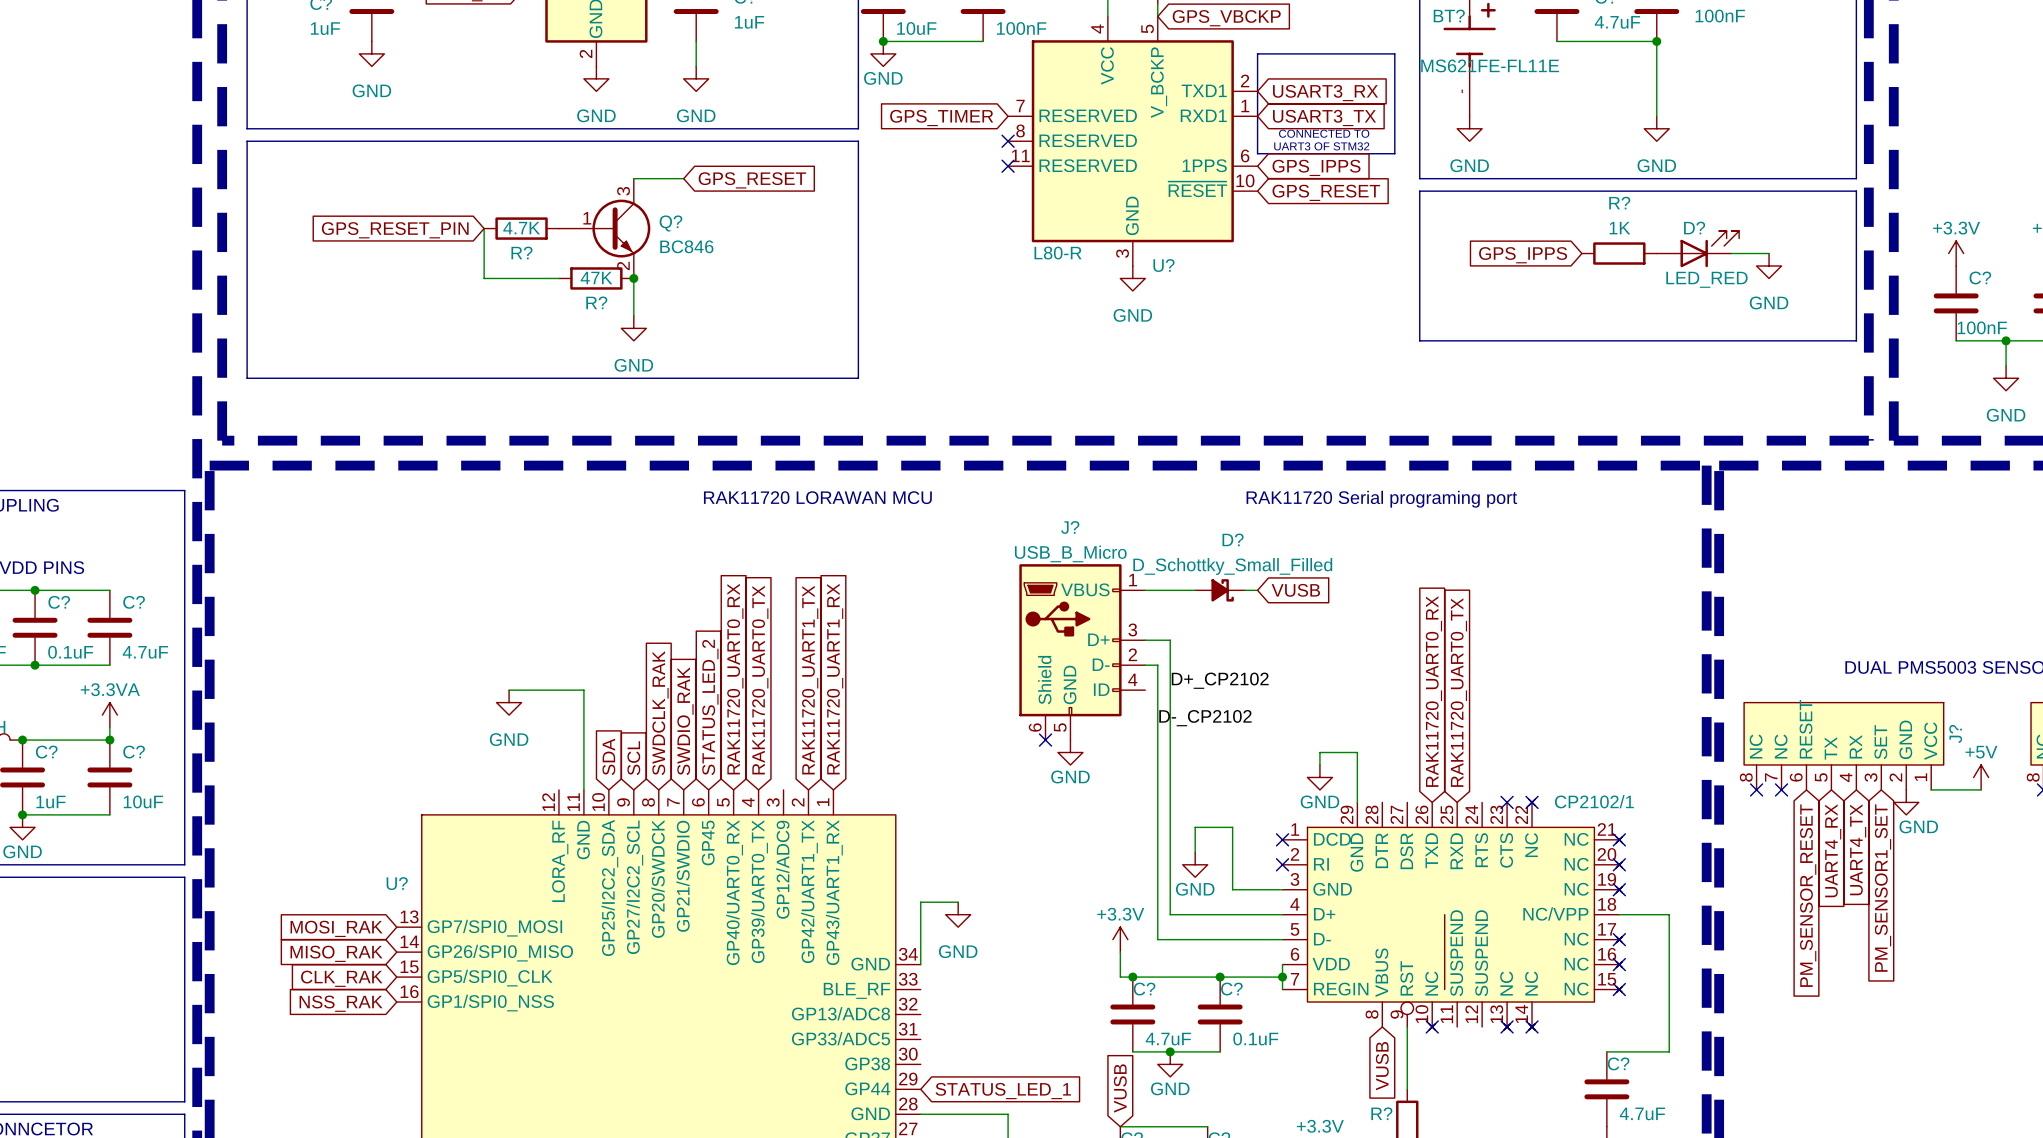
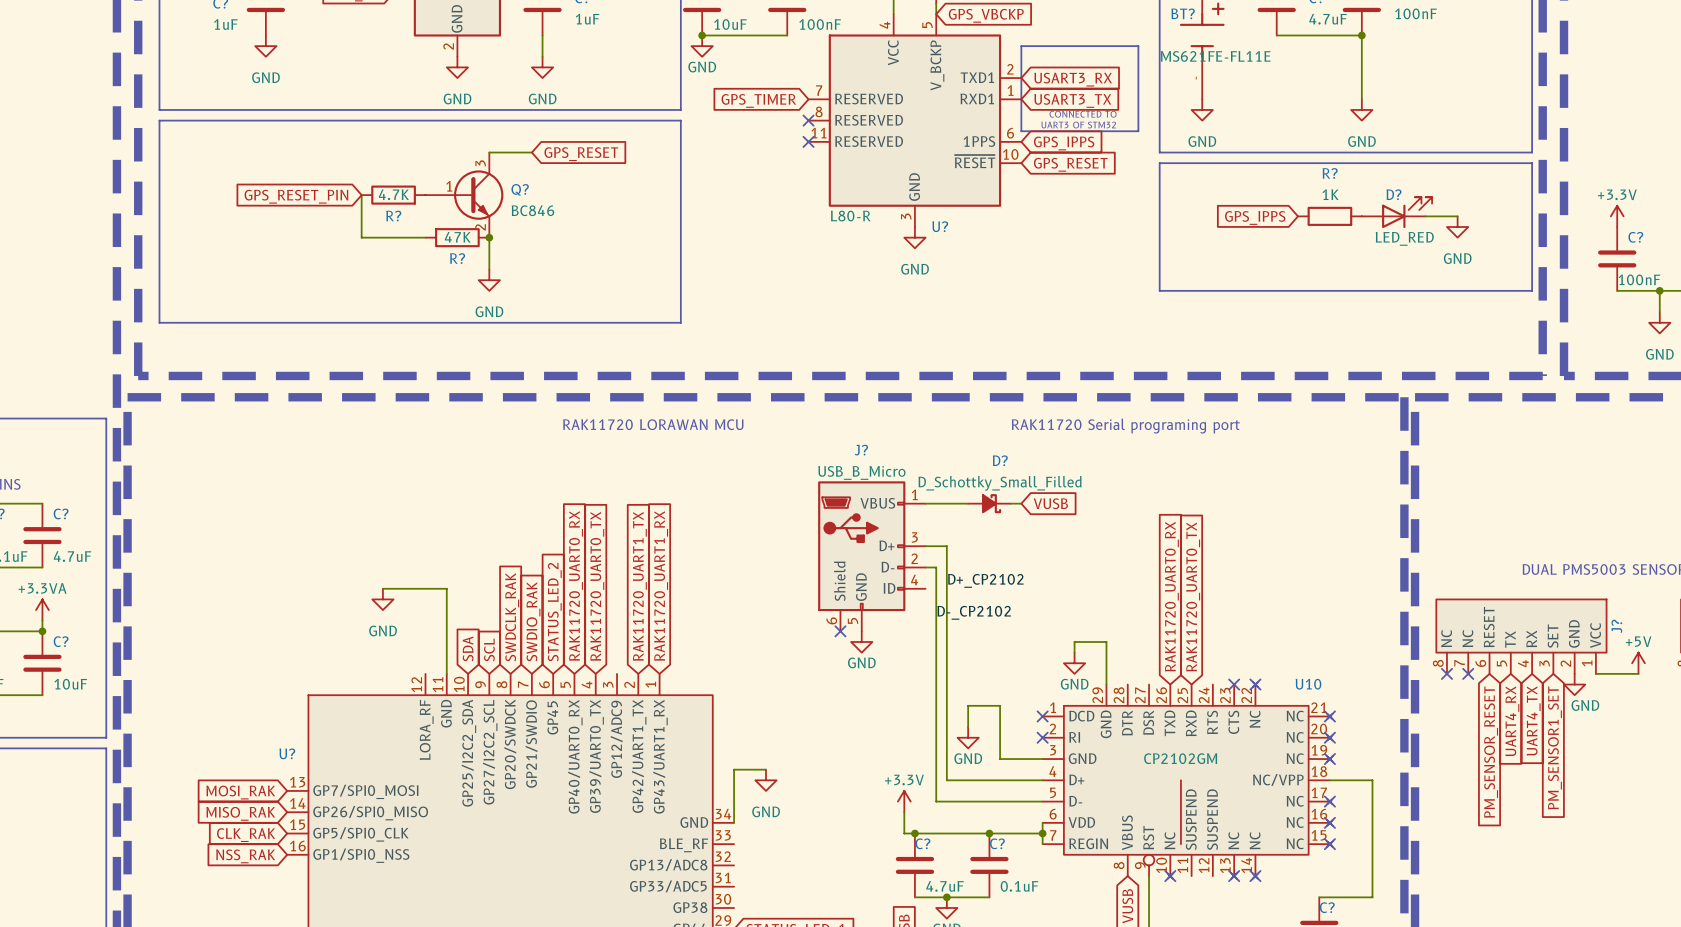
CP2102/1 name: CP2102/1 (1594, 801) -> U10 (1308, 684)
CP2102/1 value: none -> CP2102GM (1180, 758)

